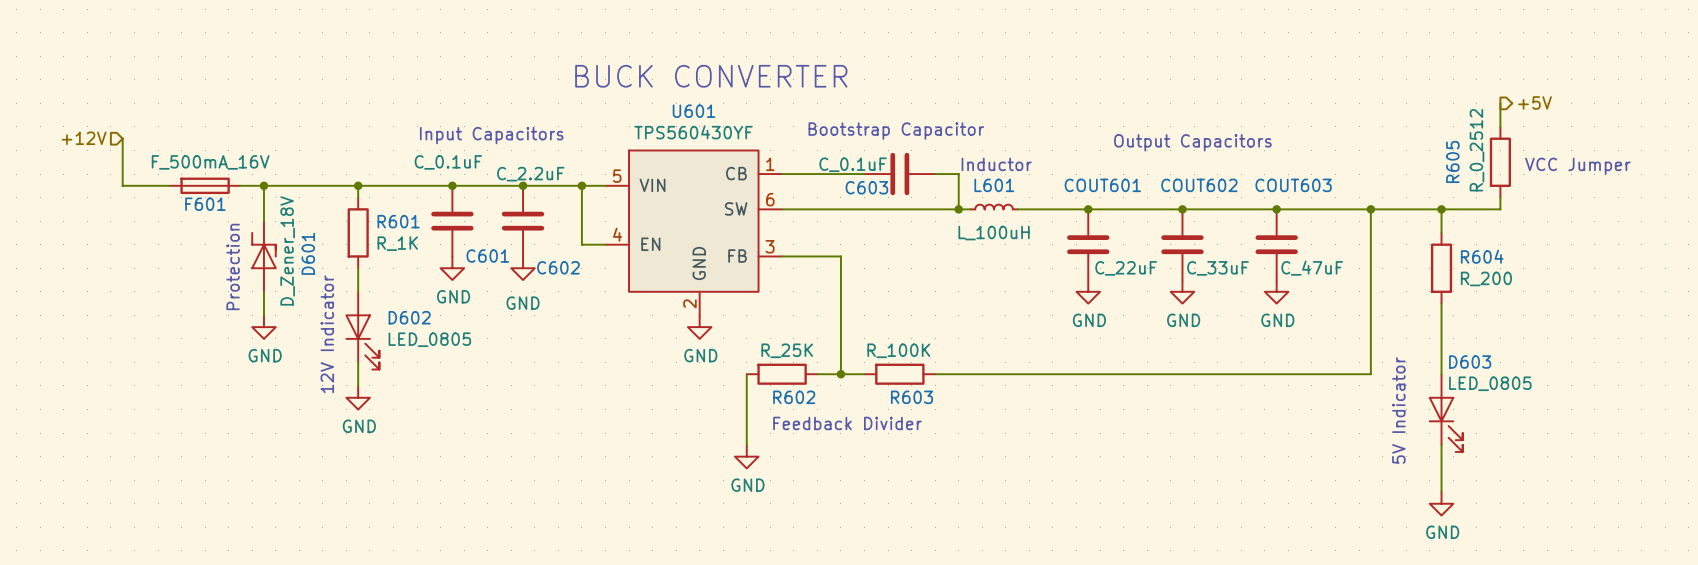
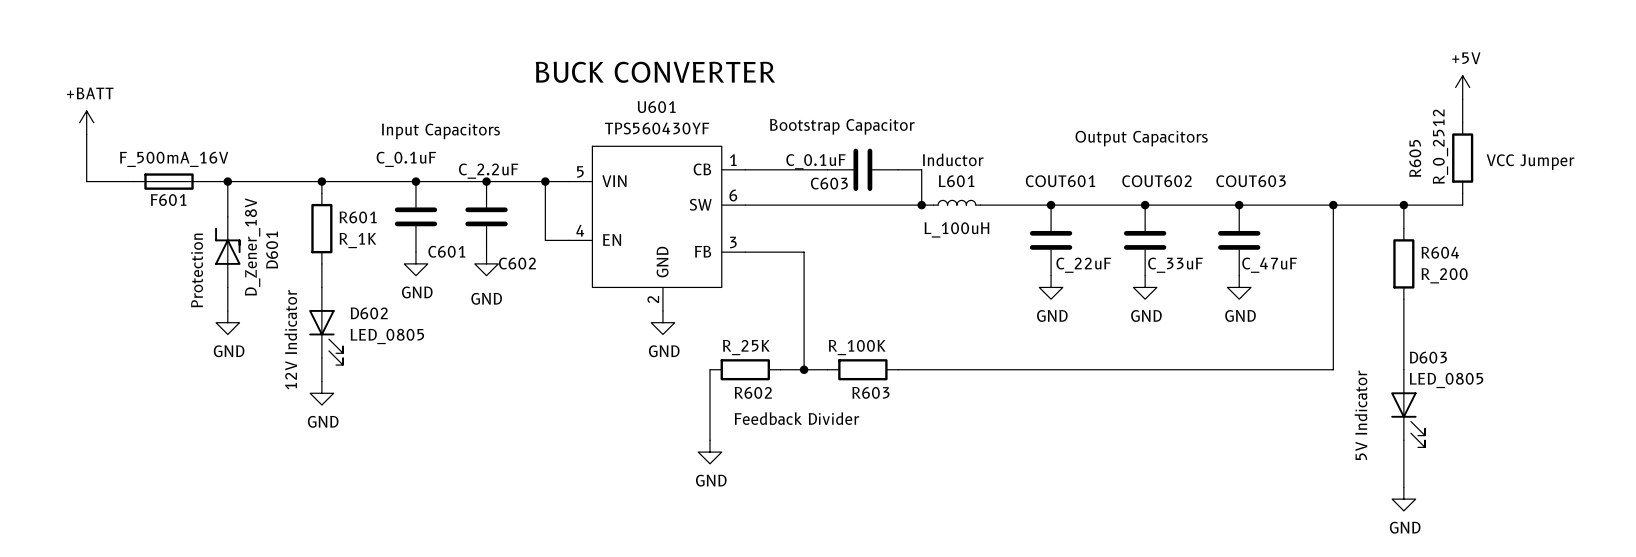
power symbol: none -> +5V (1462, 87)
hierarchical label: +5V (1535, 102) -> none
power symbol: none -> +BATT (86, 122)
hierarchical label: +12V (84, 138) -> none

